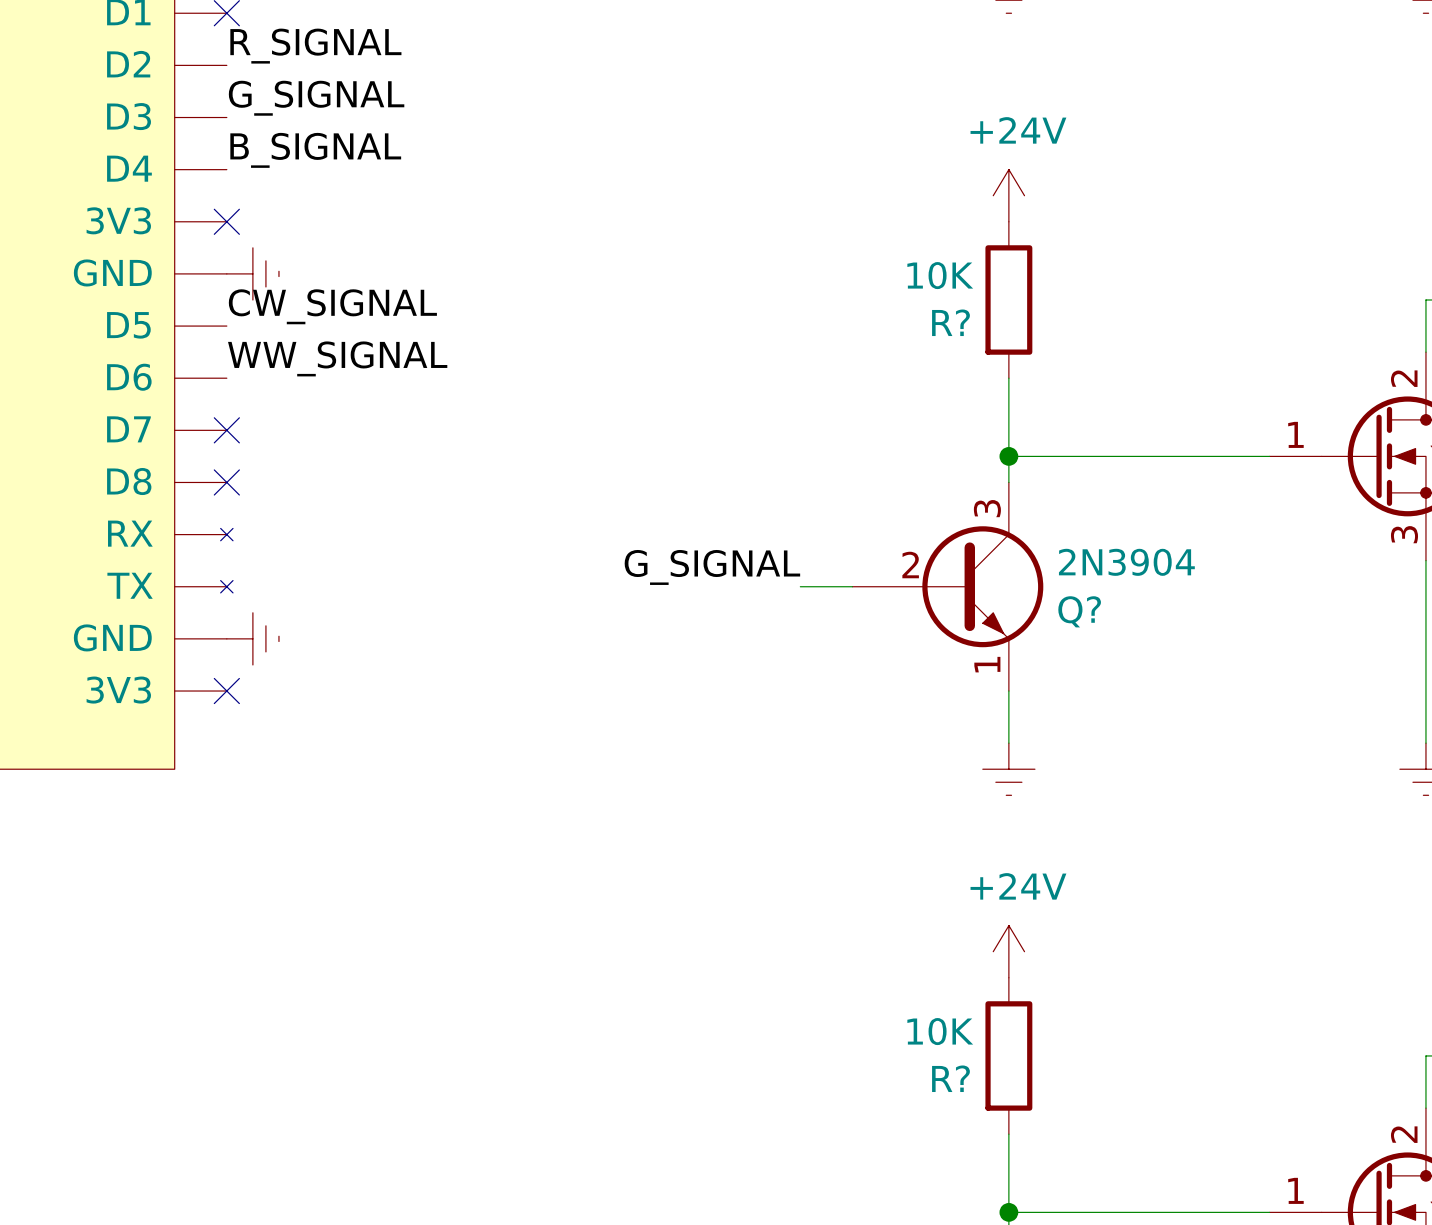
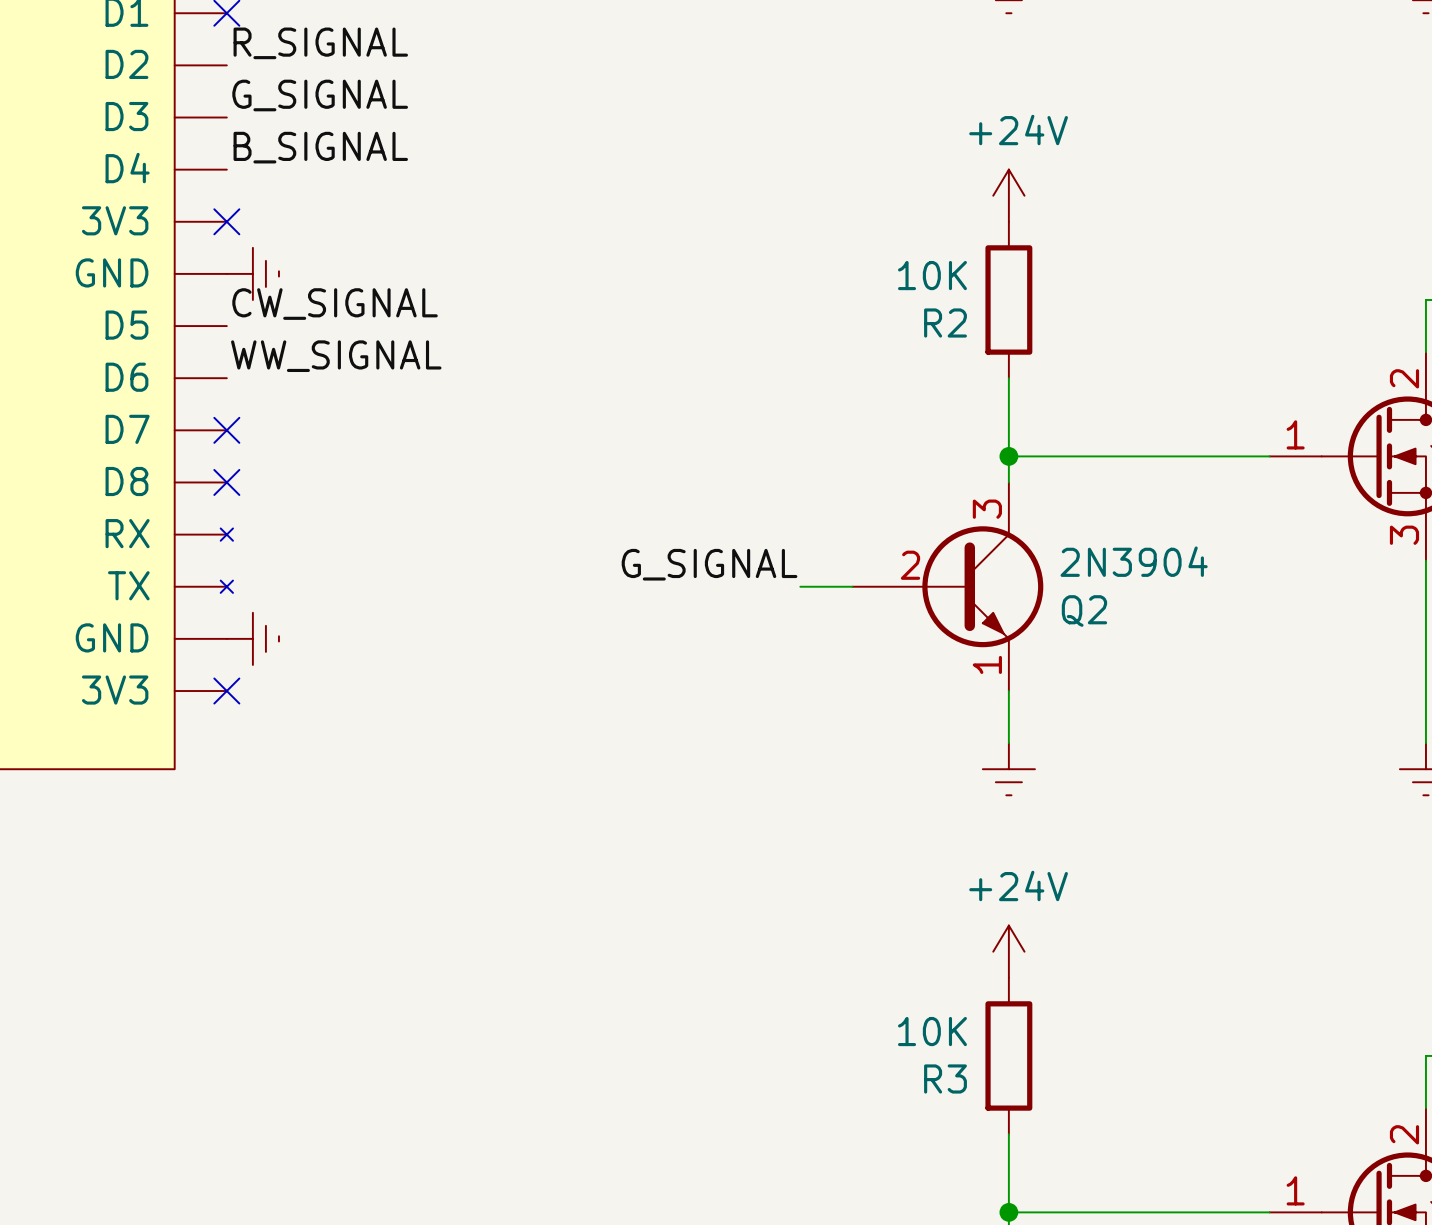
R? name: R? (950, 322) -> R2 (945, 323)
Q? name: Q? (1079, 611) -> Q2 (1084, 610)
R? name: R? (950, 1078) -> R3 (945, 1078)

